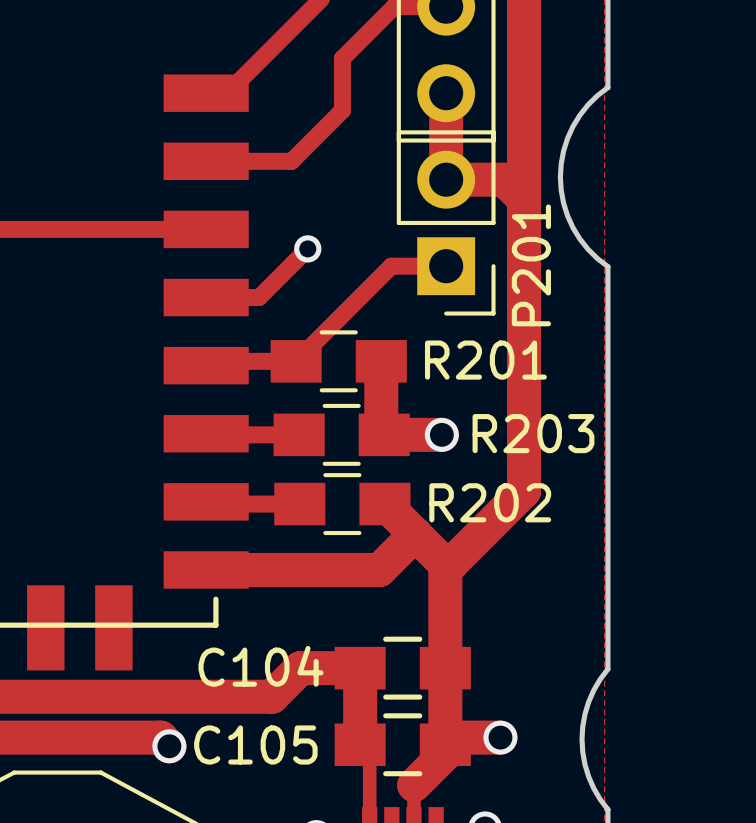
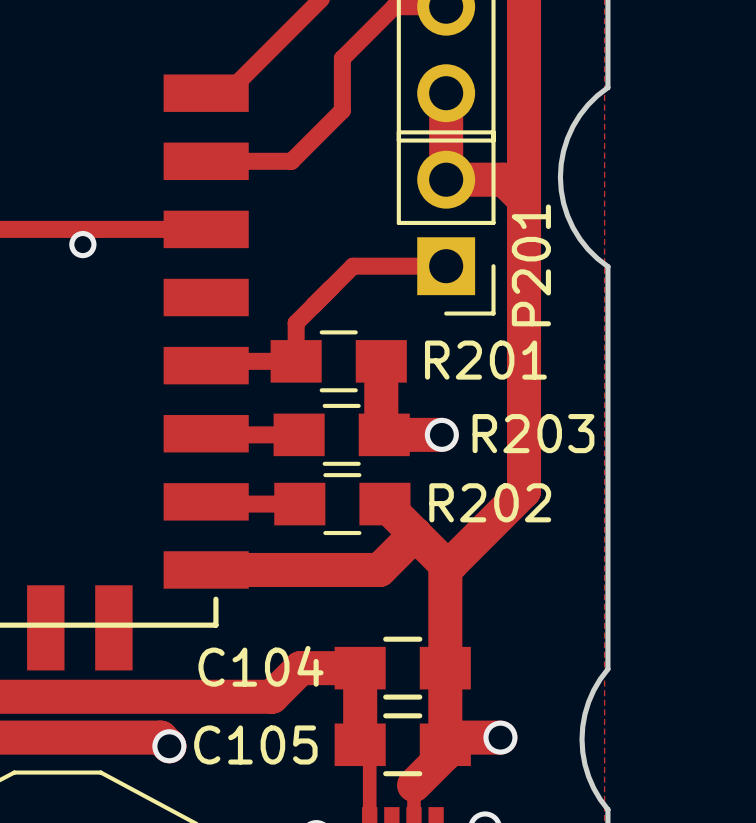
via: none -> (82, 244)
track: (307, 248) (259, 297) (182, 297) -> none
via: (307, 248) -> none
track: (391, 266) (296, 361) -> (391, 266) (353, 266) (296, 323) (296, 361)

